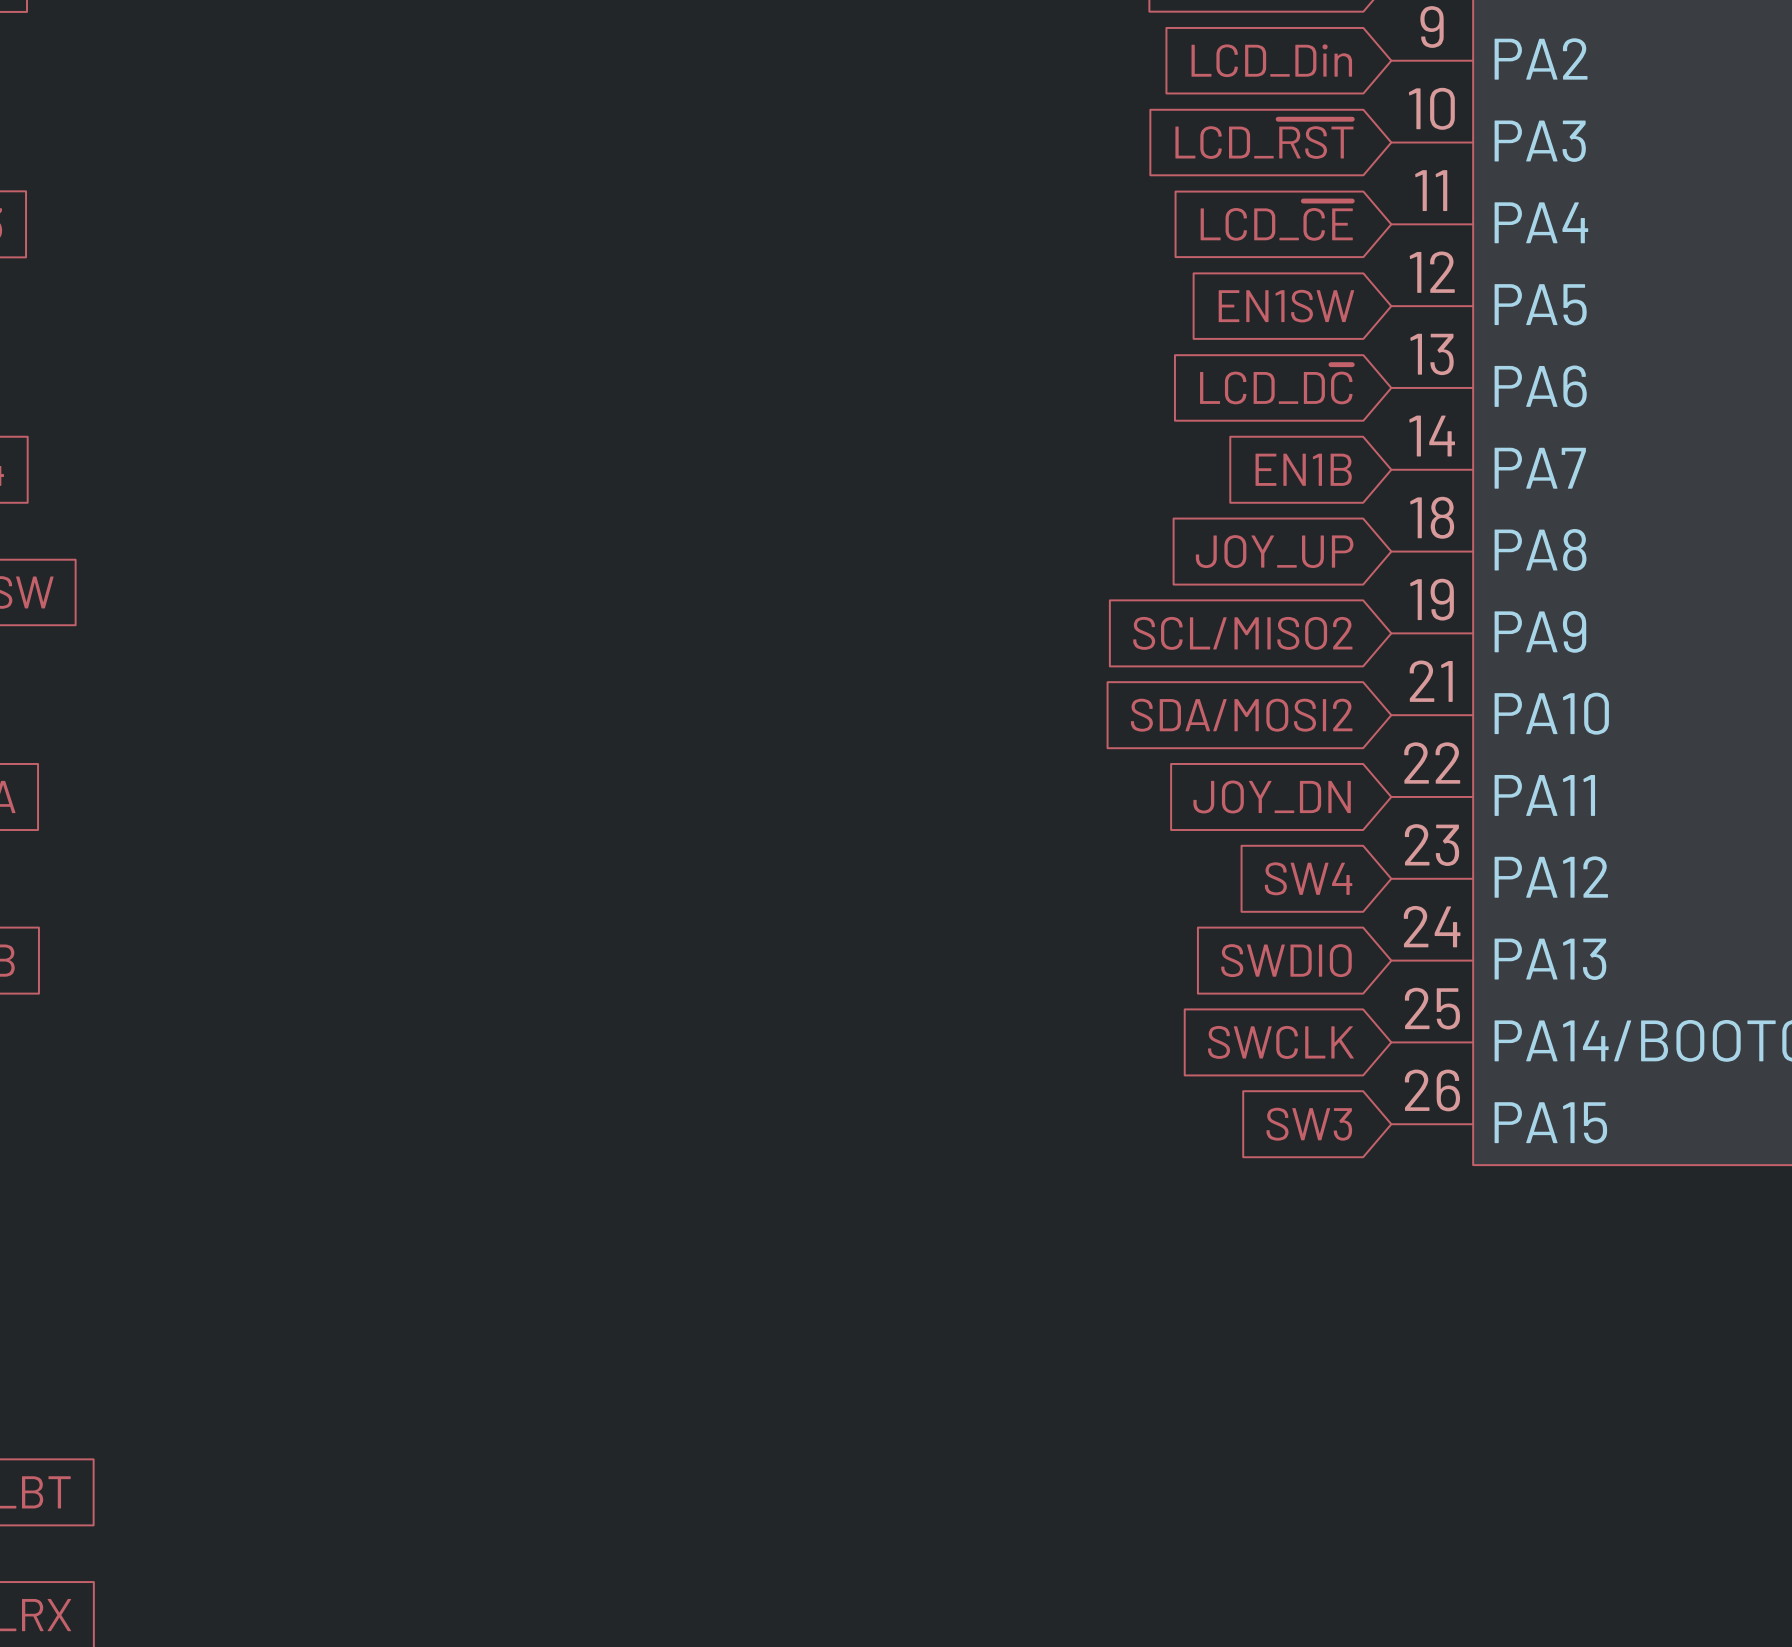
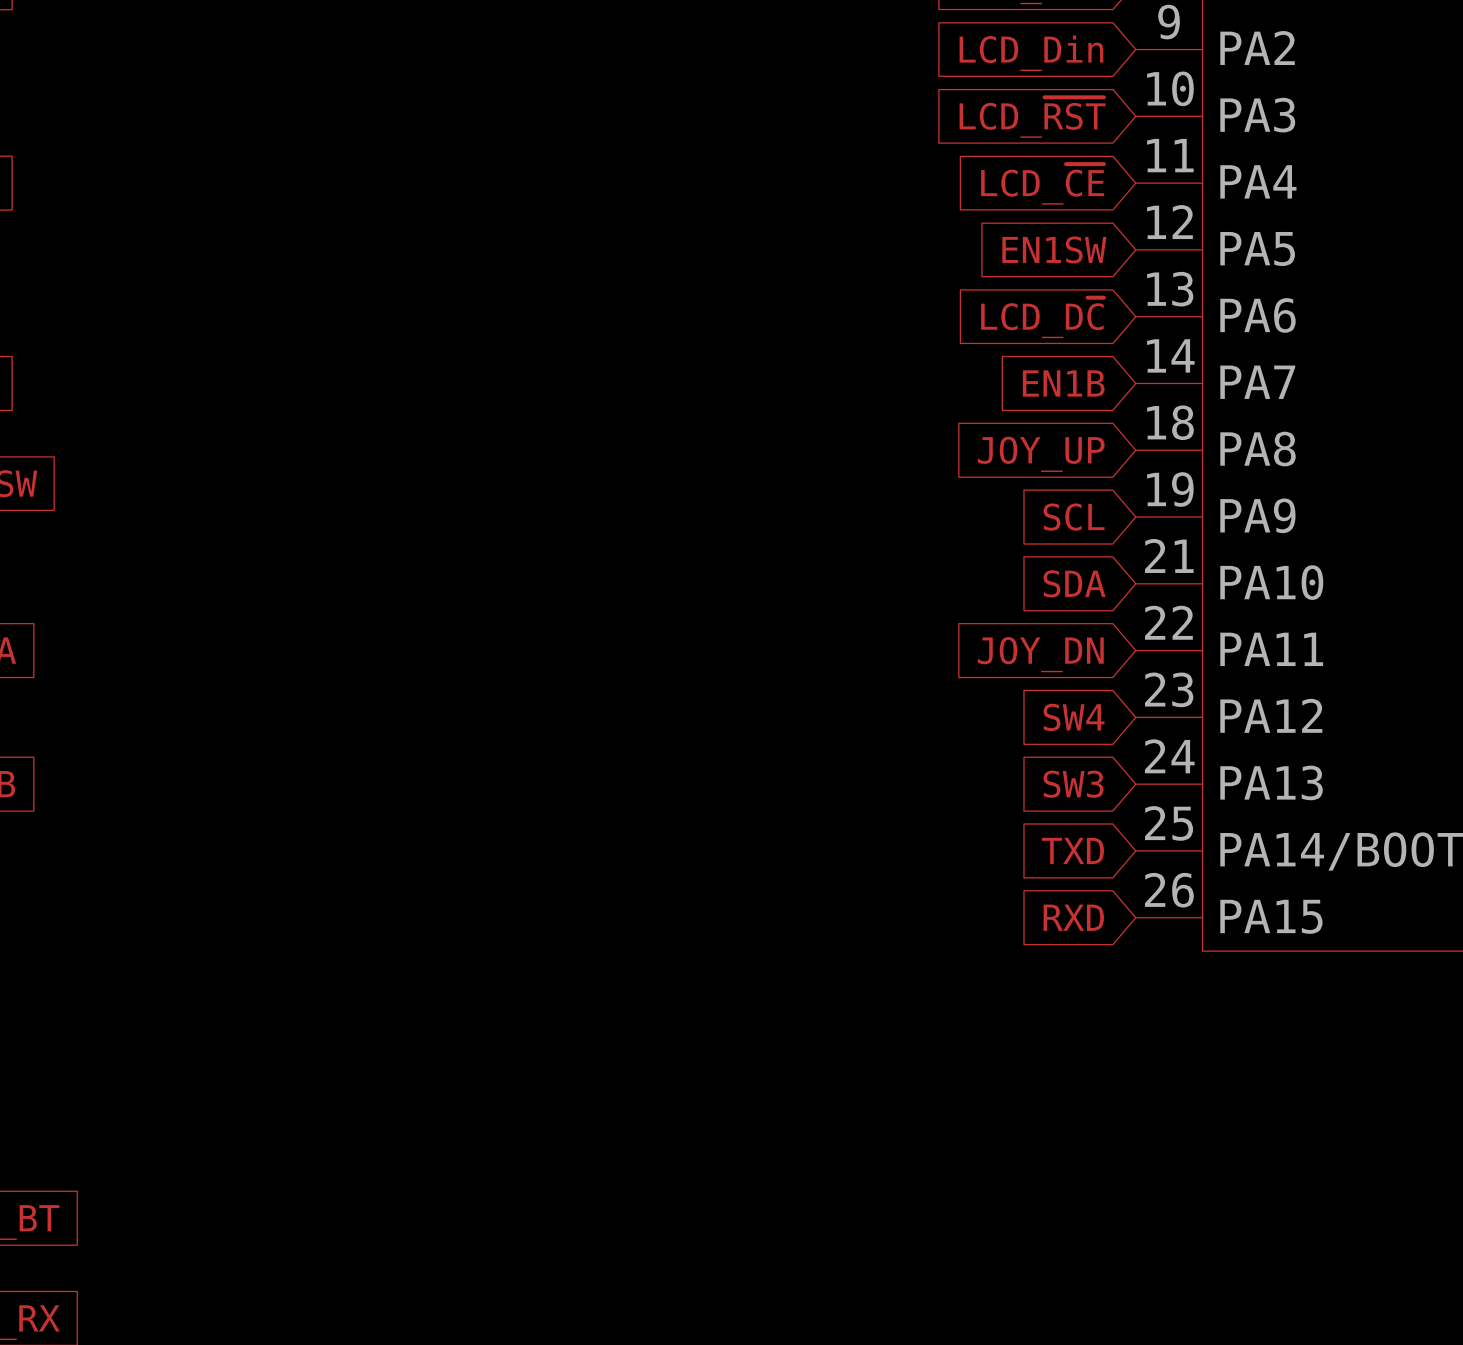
global label: SCL/MISO2 (1242, 633) -> SCL (1074, 517)
global label: SDA/MOSI2 (1241, 715) -> SDA (1074, 583)
global label: SWDIO (1286, 960) -> SW3 (1073, 784)
global label: SWCLK (1280, 1042) -> TXD (1072, 850)
global label: SW3 (1309, 1124) -> RXD (1073, 917)

